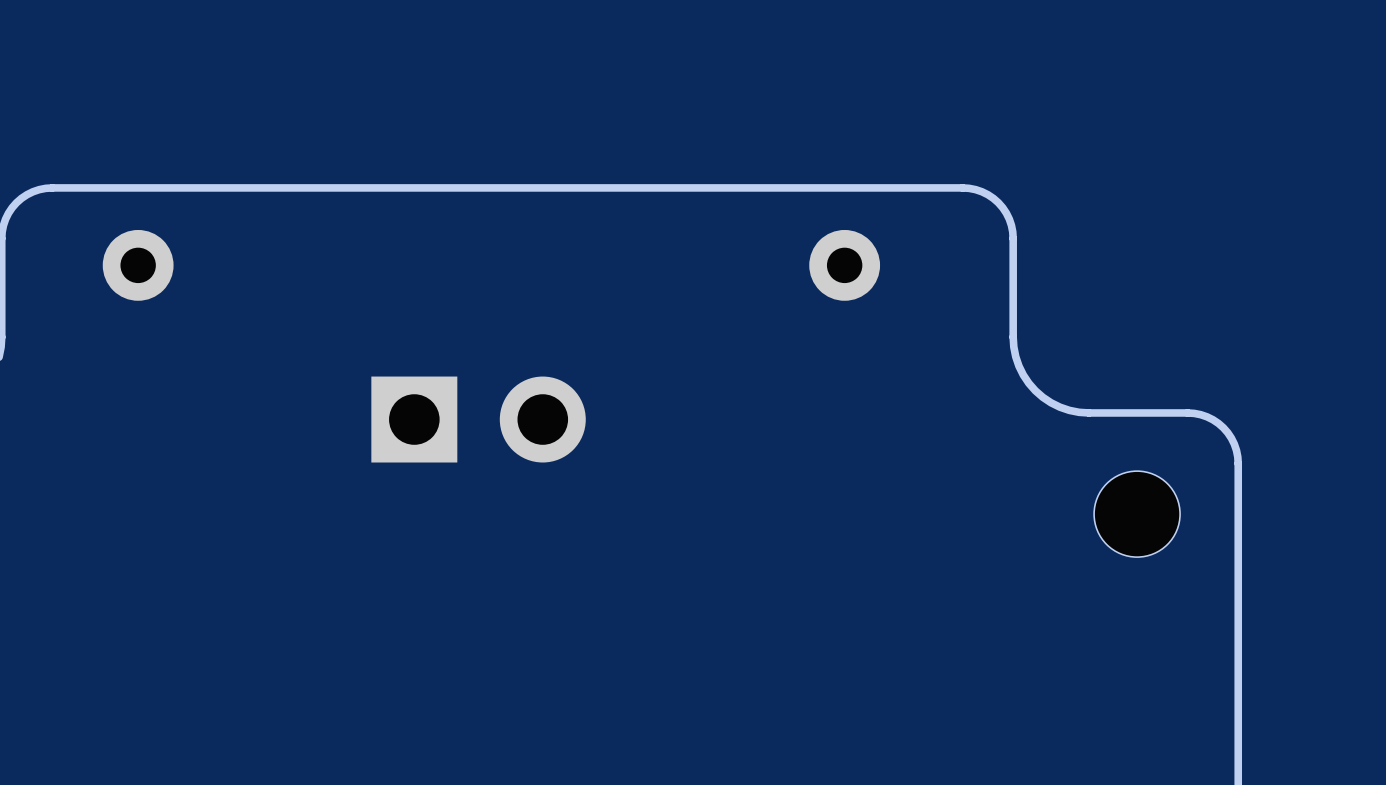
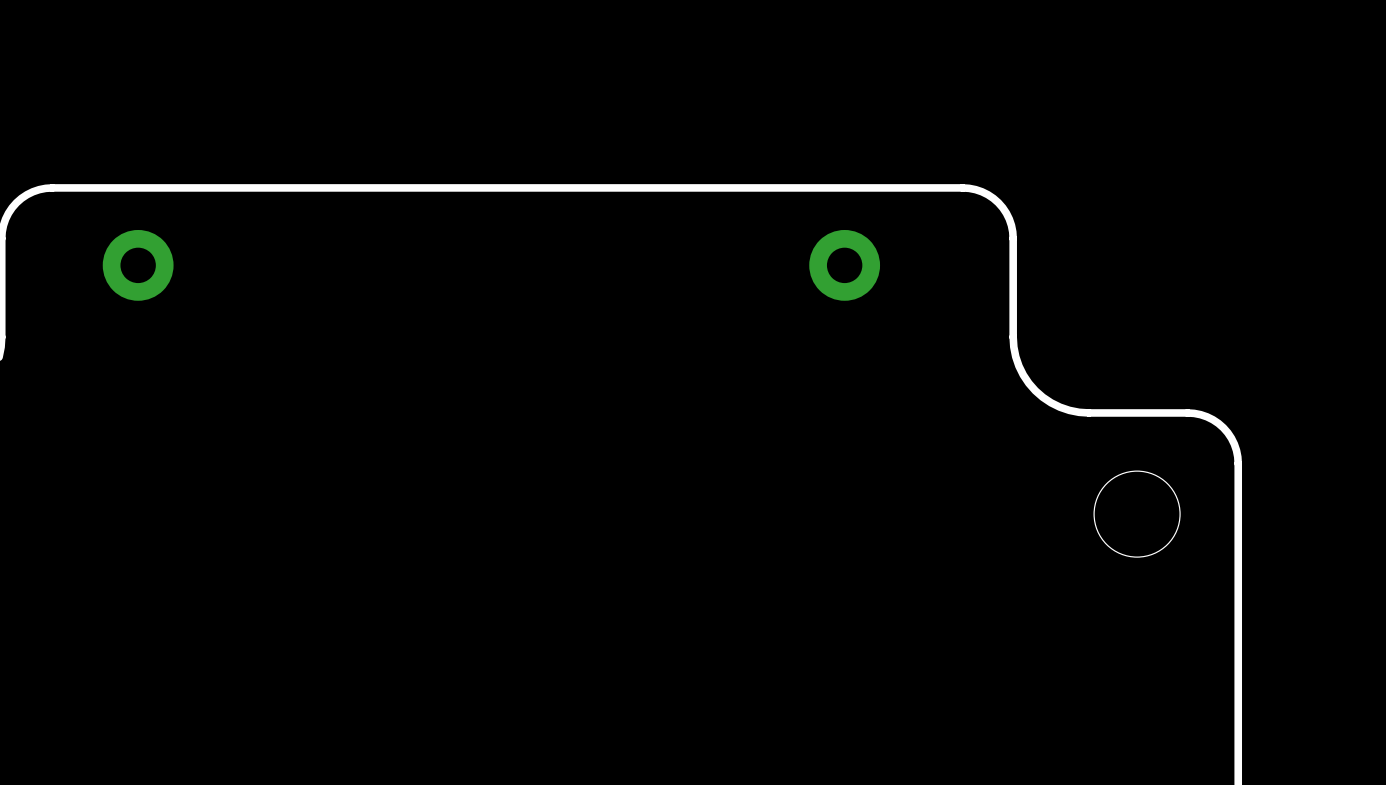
part: (478, 419) -> none

